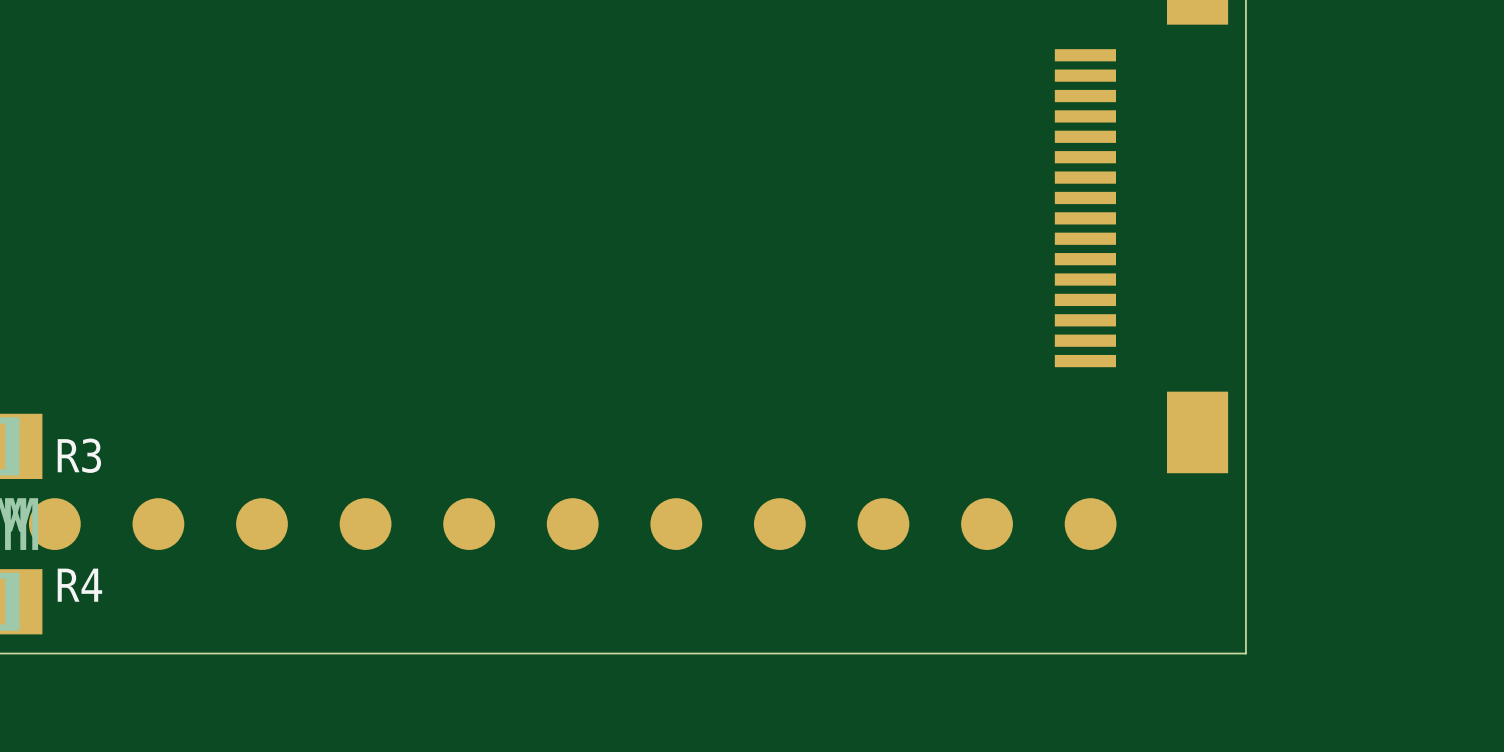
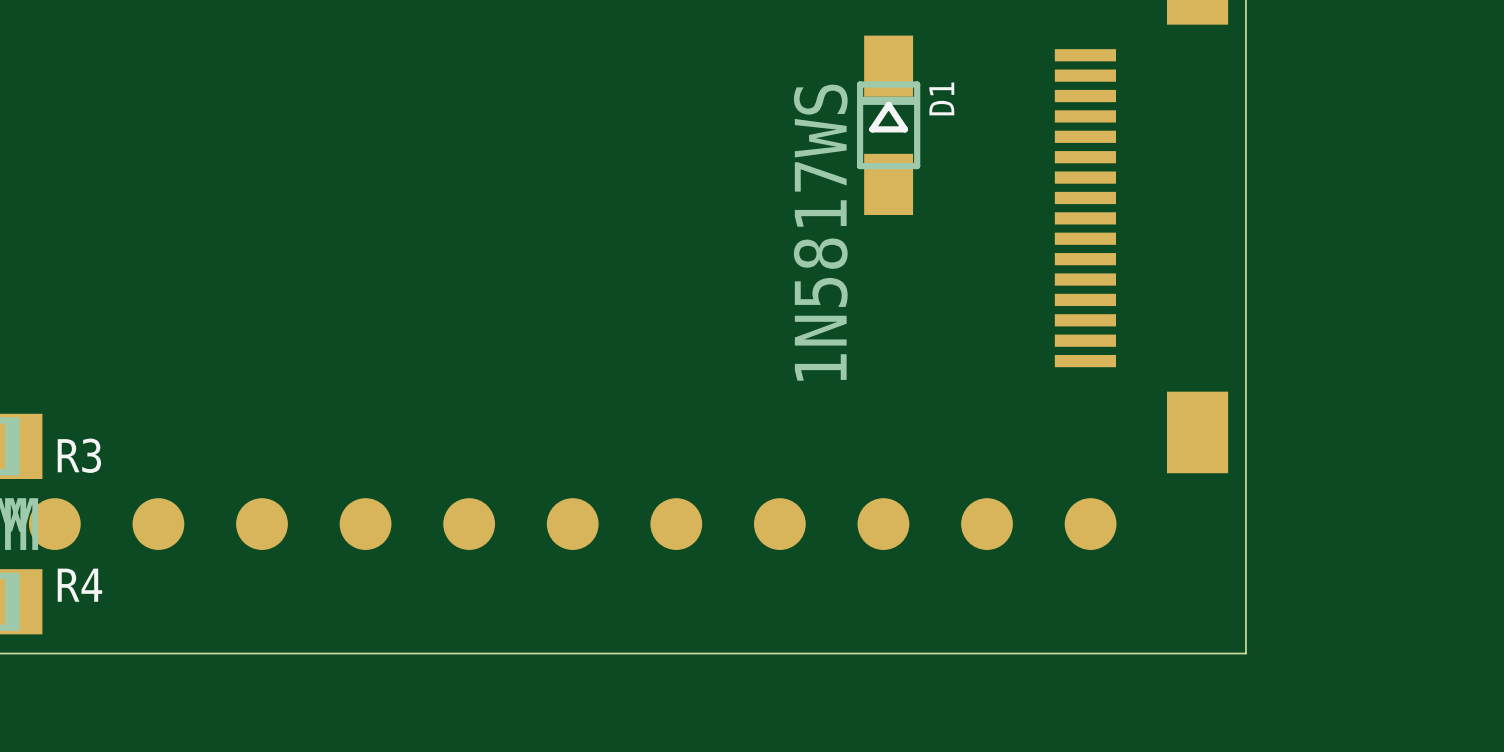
D1: none -> 1N5817WS (888, 125)

